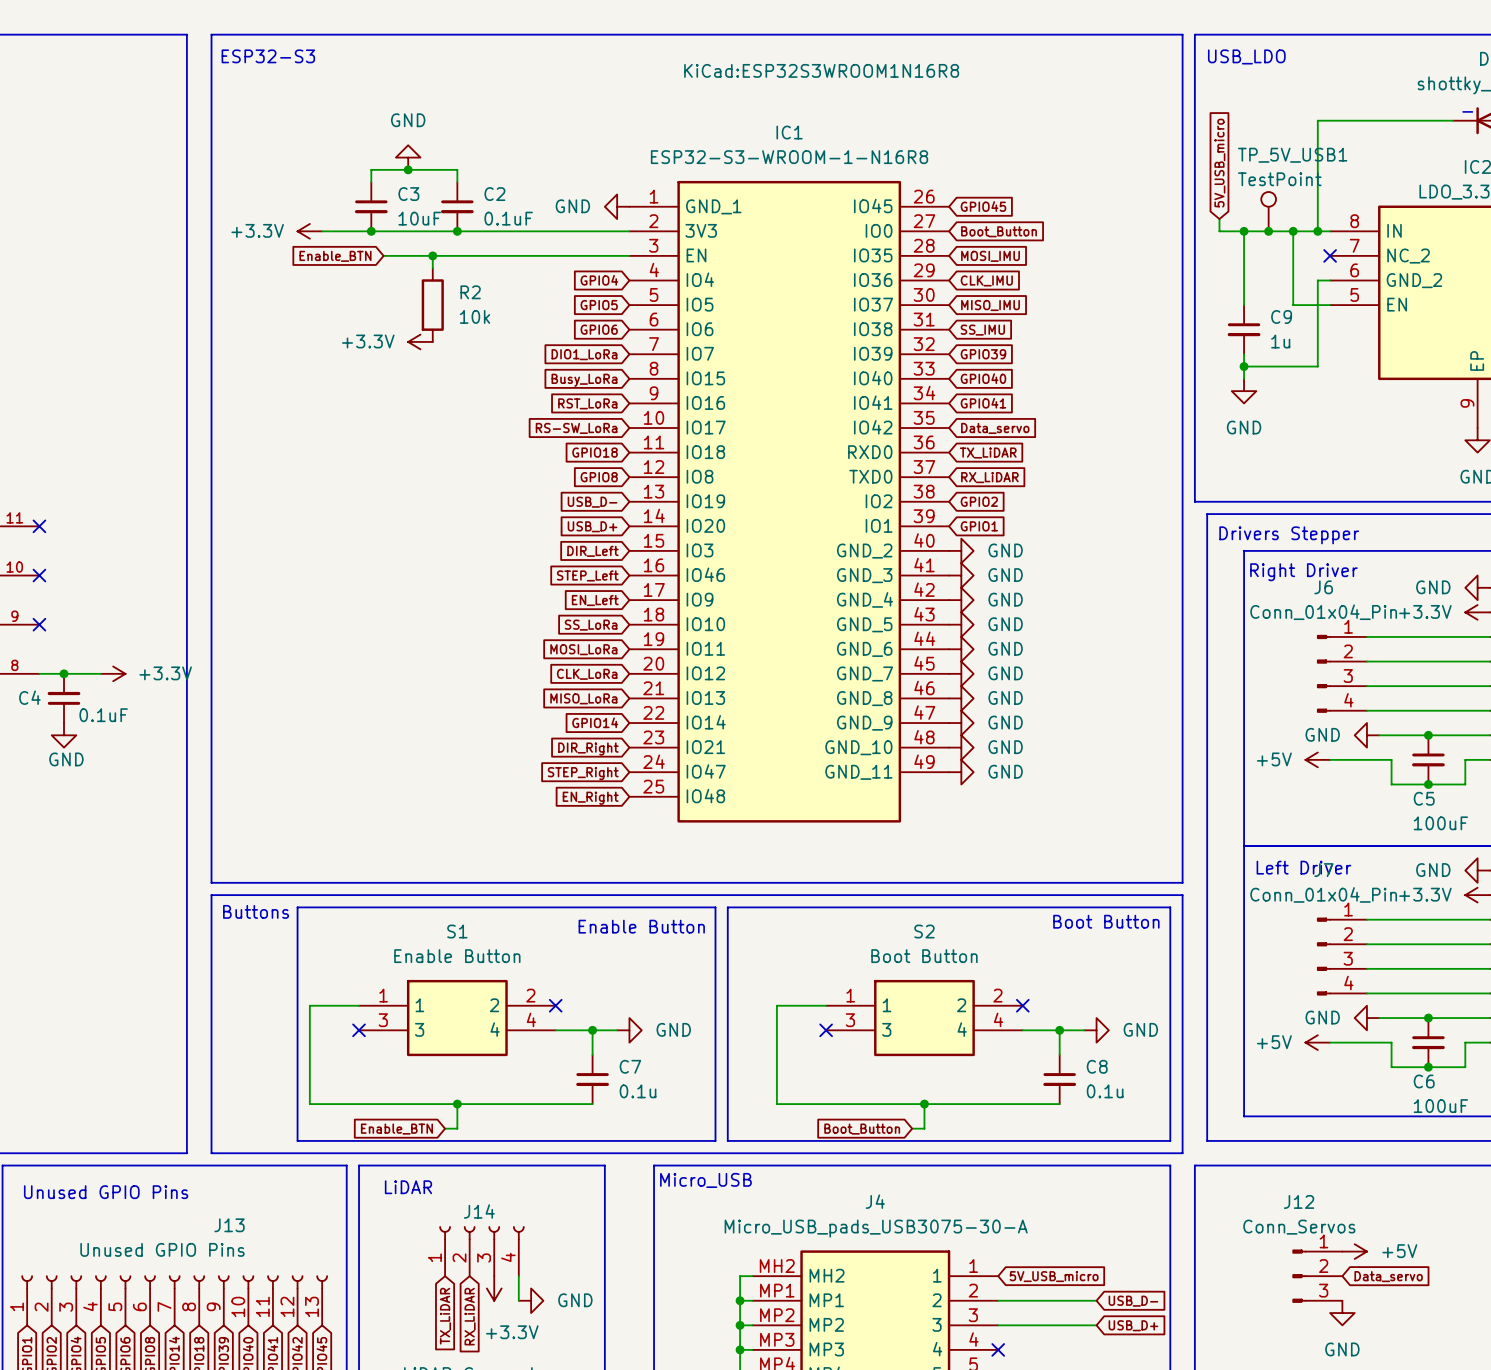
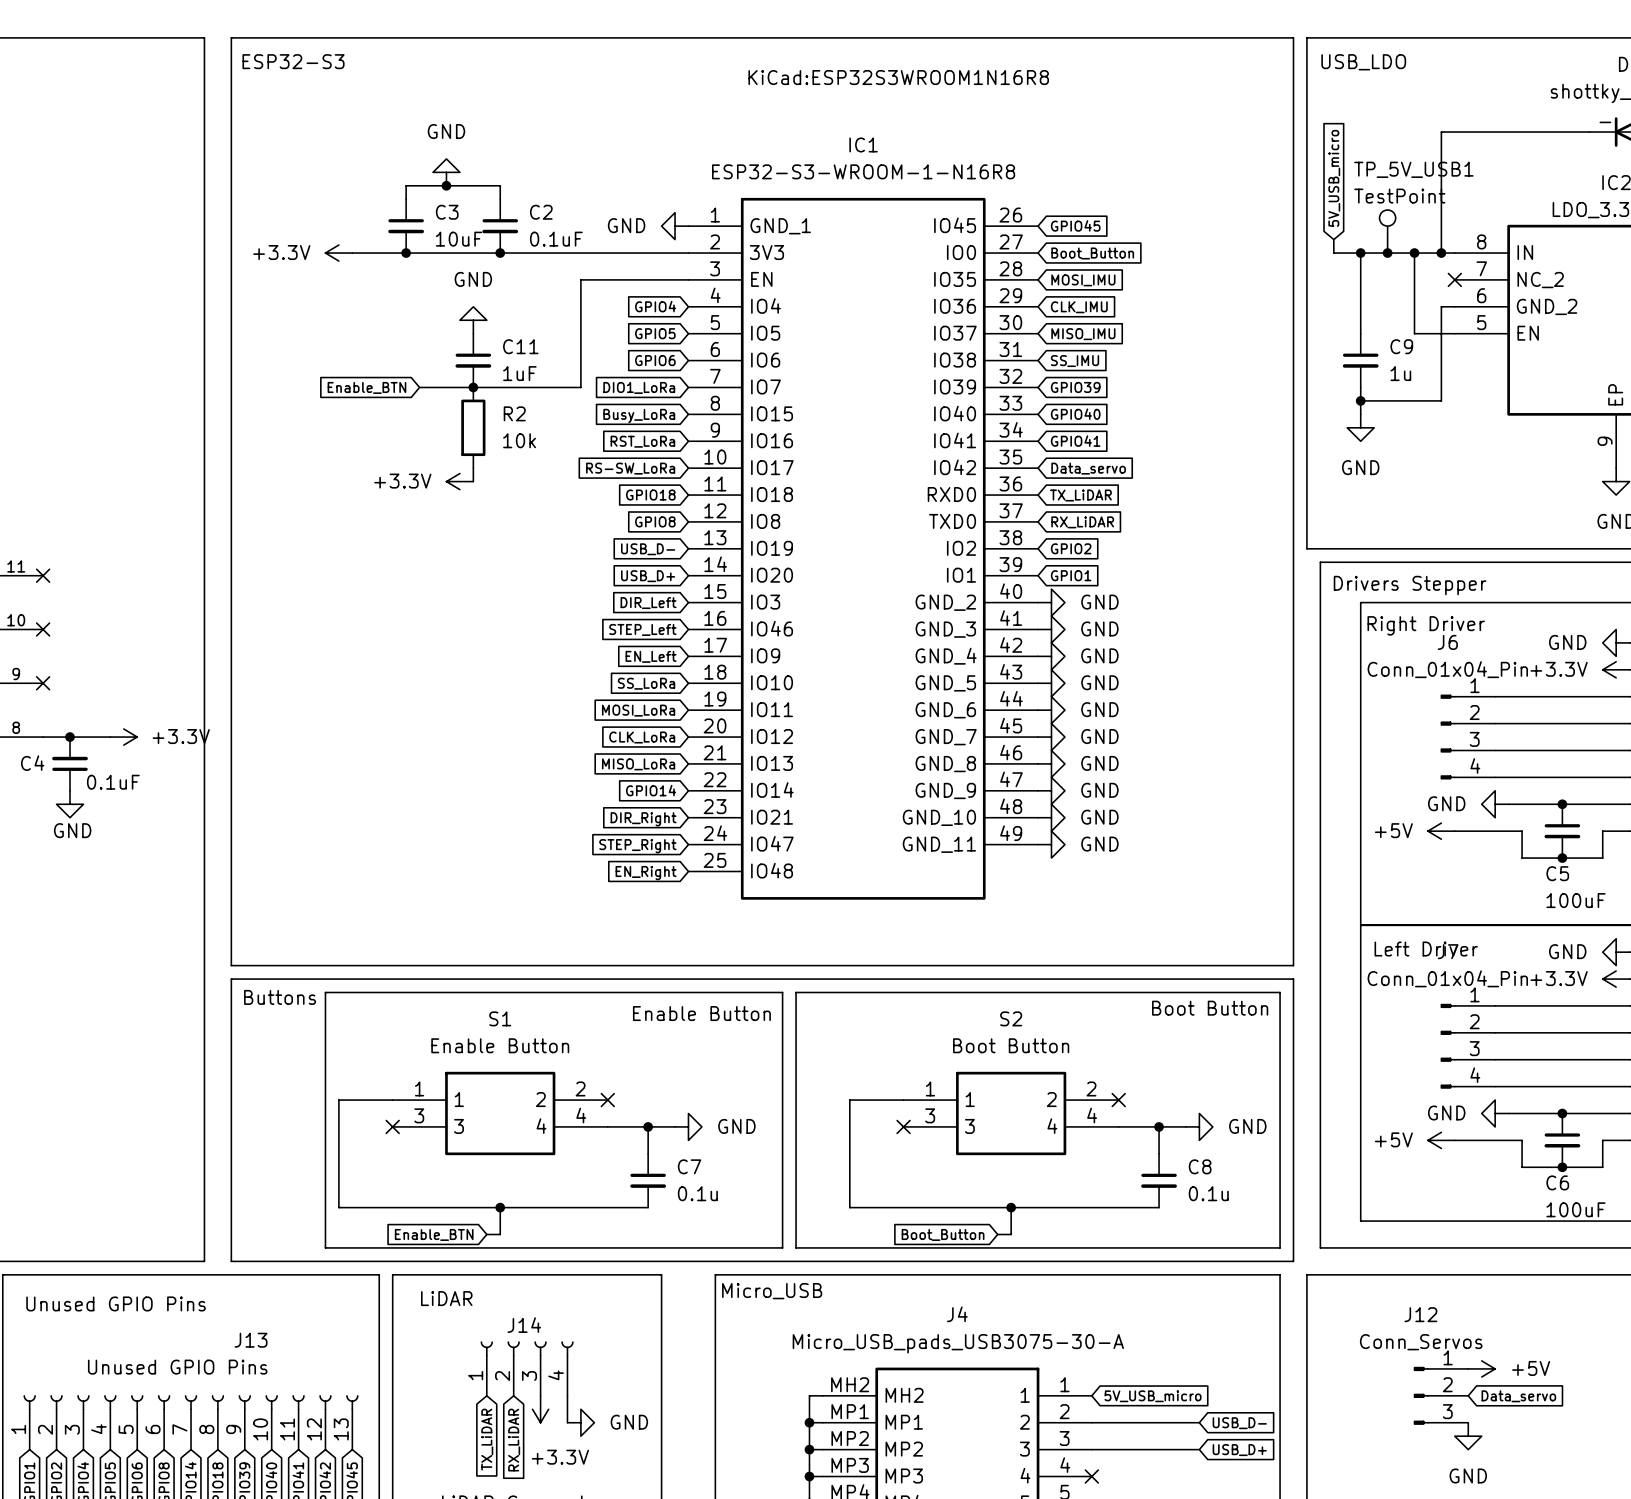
wire: (383, 255) (531, 255) -> (419, 387) (580, 387) (580, 279)
wire: (432, 255) (432, 268) -> (473, 468) (473, 481)
junction: (432, 255) -> none
global label position: Enable_BTN (335, 256) -> Enable_BTN (366, 387)
power symbol: none -> GND (473, 320)
R2 position: (432, 305) -> (473, 427)
C11: none -> 1uF (473, 360)
power symbol position: +3.3V (420, 341) -> +3.3V (459, 481)
junction: none -> (473, 387)

